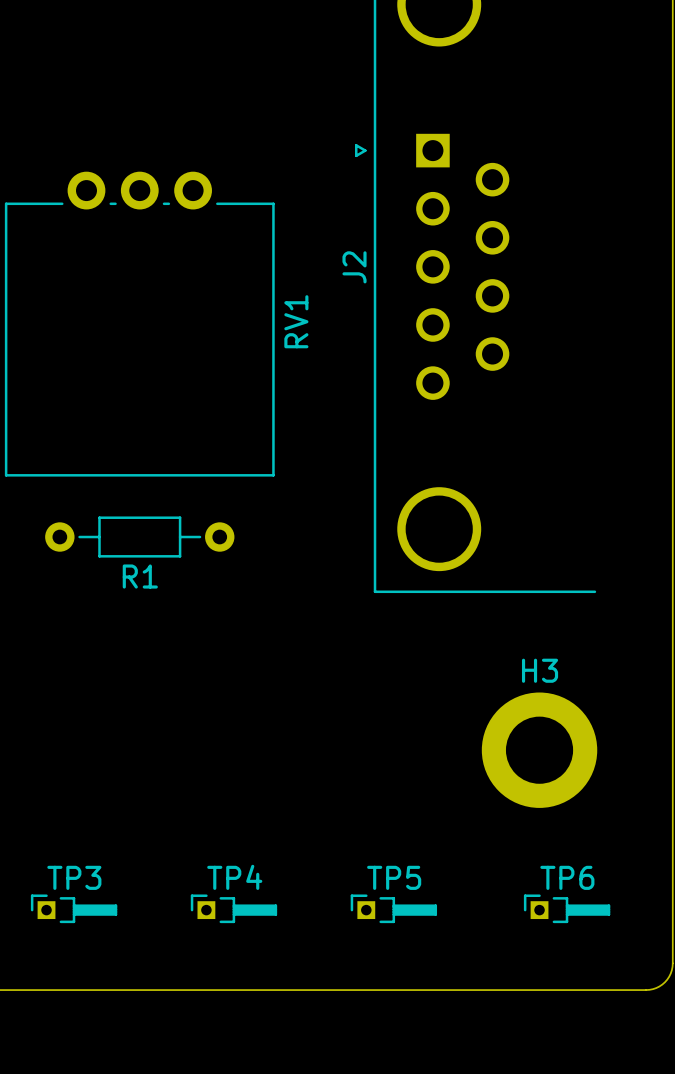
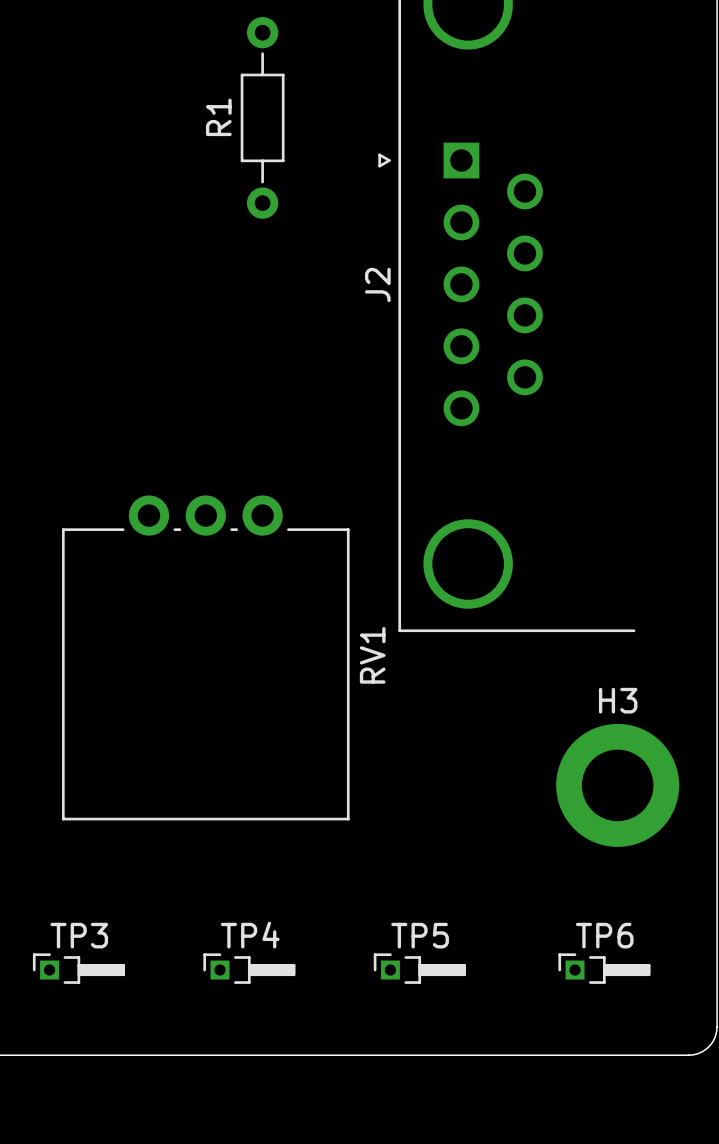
RV1 position: (139, 324) -> (205, 657)
R1 rotation: 0° (139, 537) -> 90° clockwise (262, 117)
R1 position: (139, 537) -> (262, 117)
H3 position: (539, 750) -> (617, 785)

